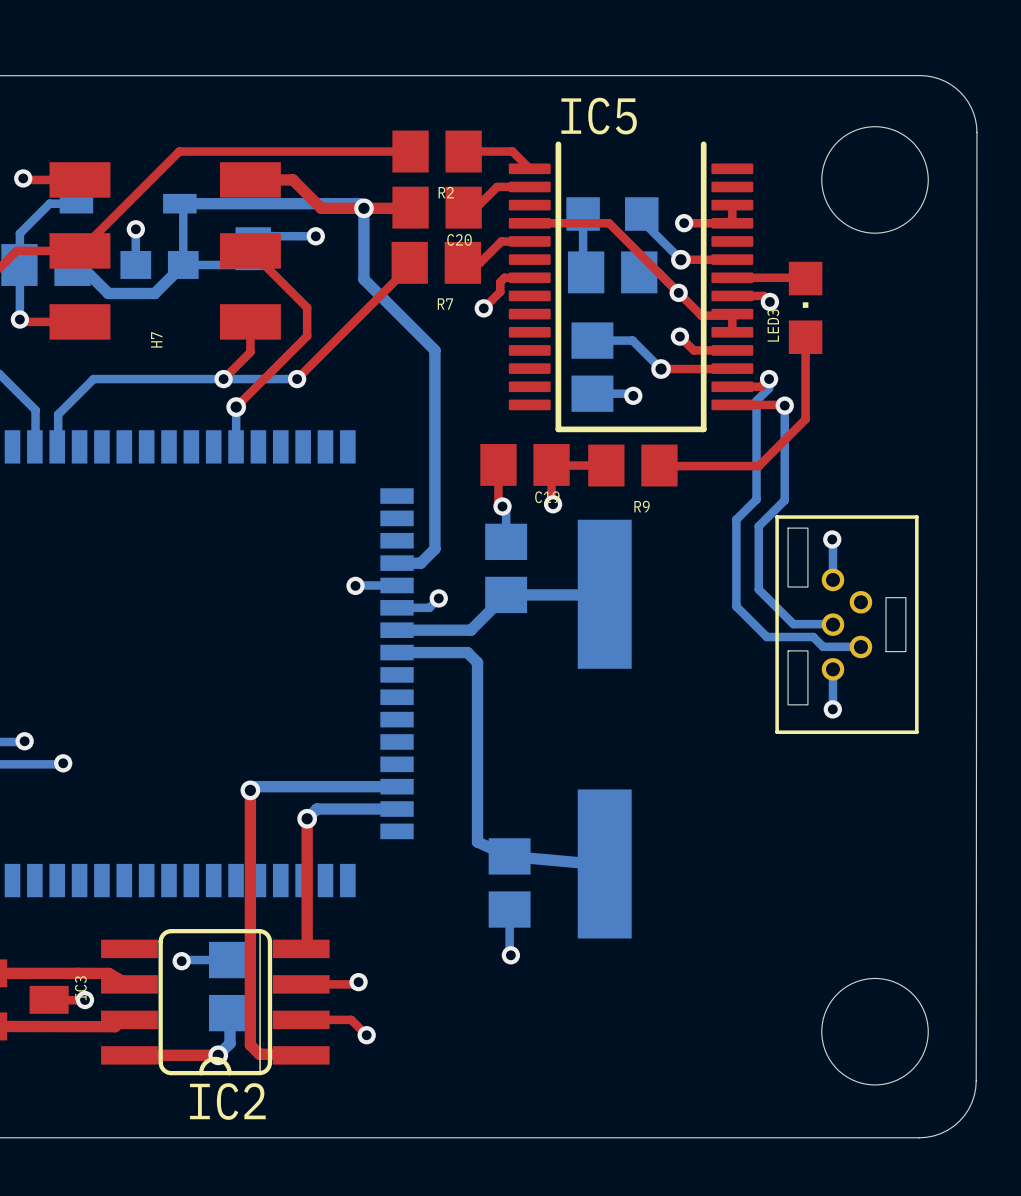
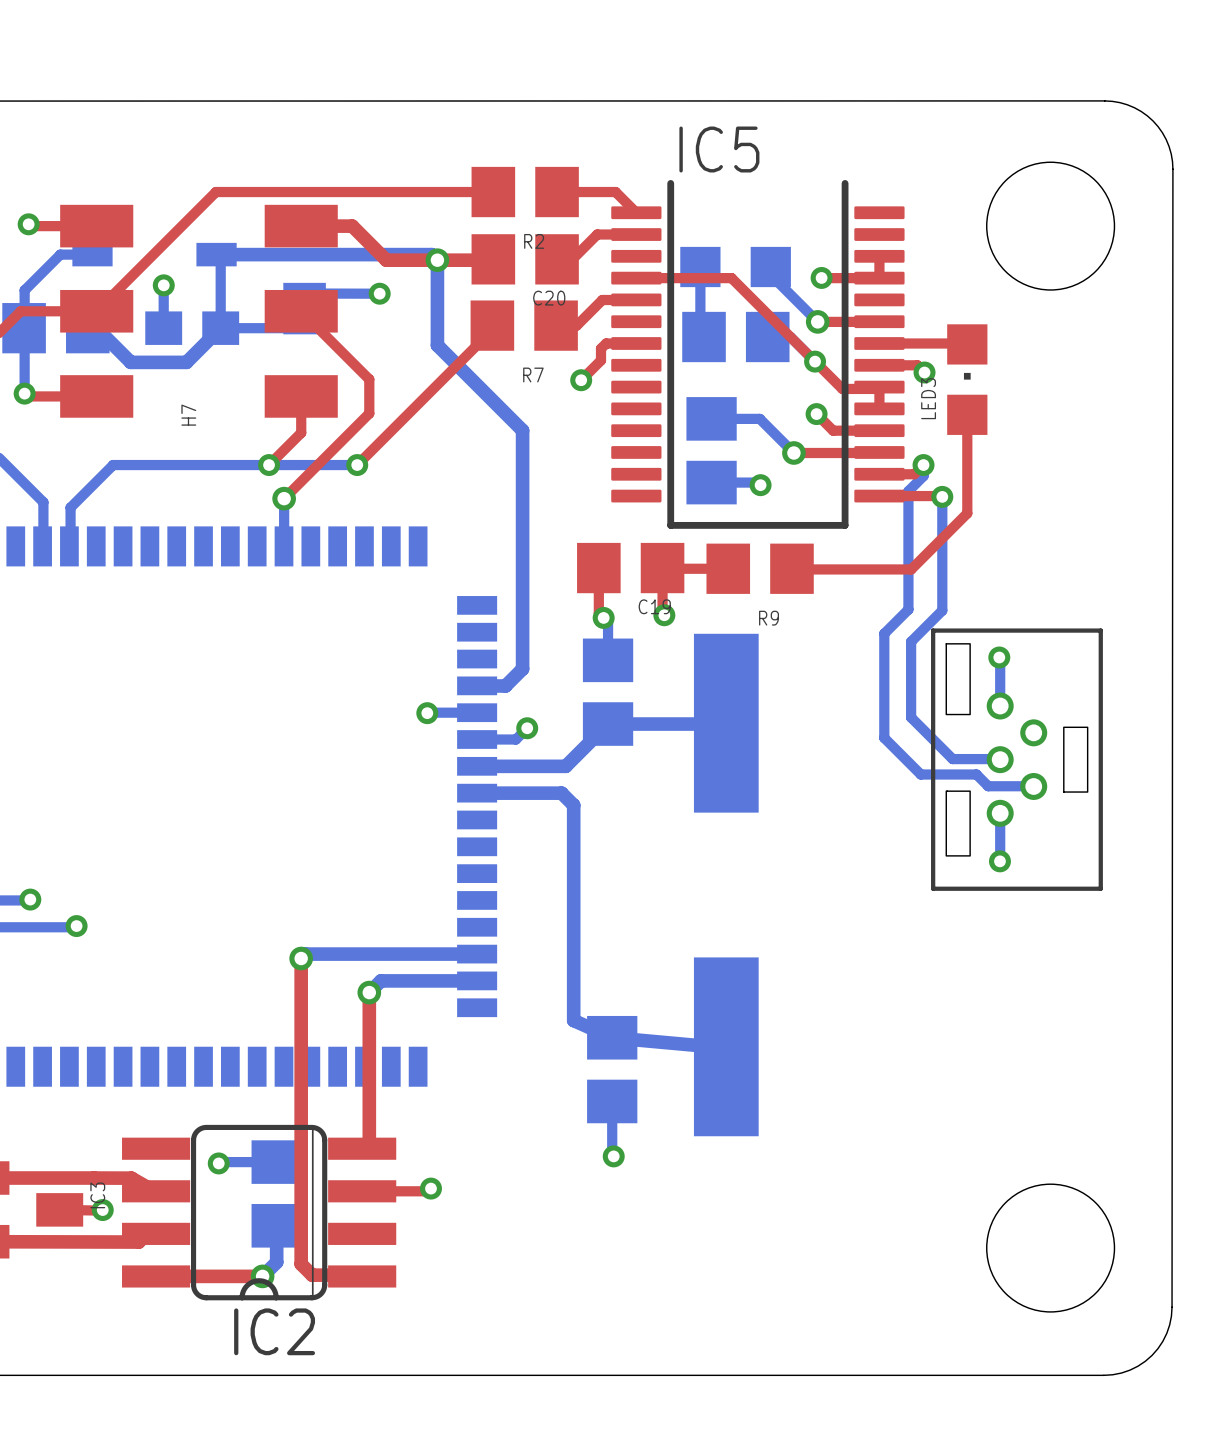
top track: (301, 1019) (351, 1019) (366, 1035) -> none
via: (366, 1035) -> none

